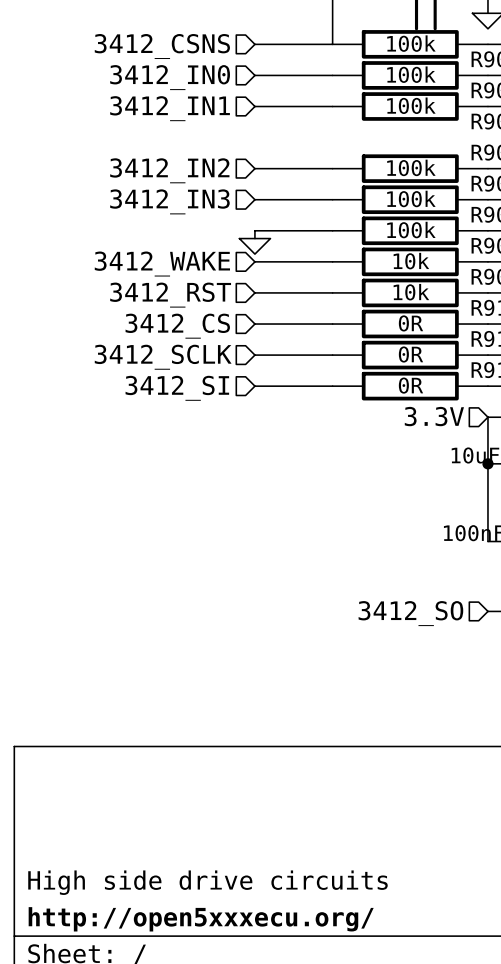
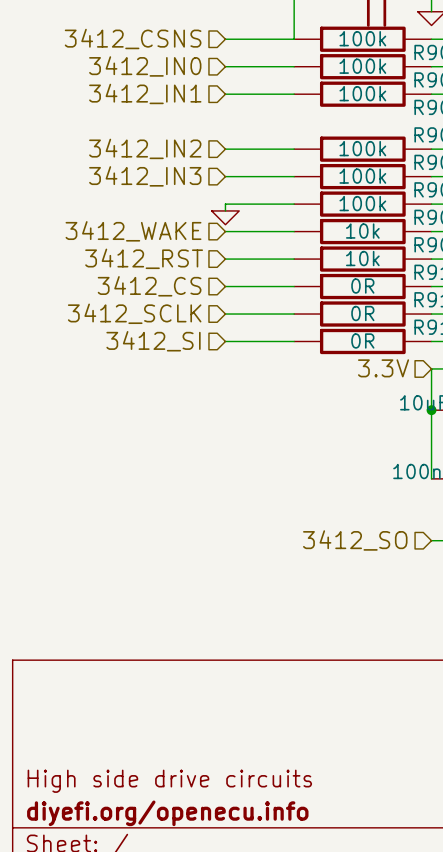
title block: http://open5xxxecu.org/ (201, 919) -> diyefi.org/openecu.info (167, 813)

